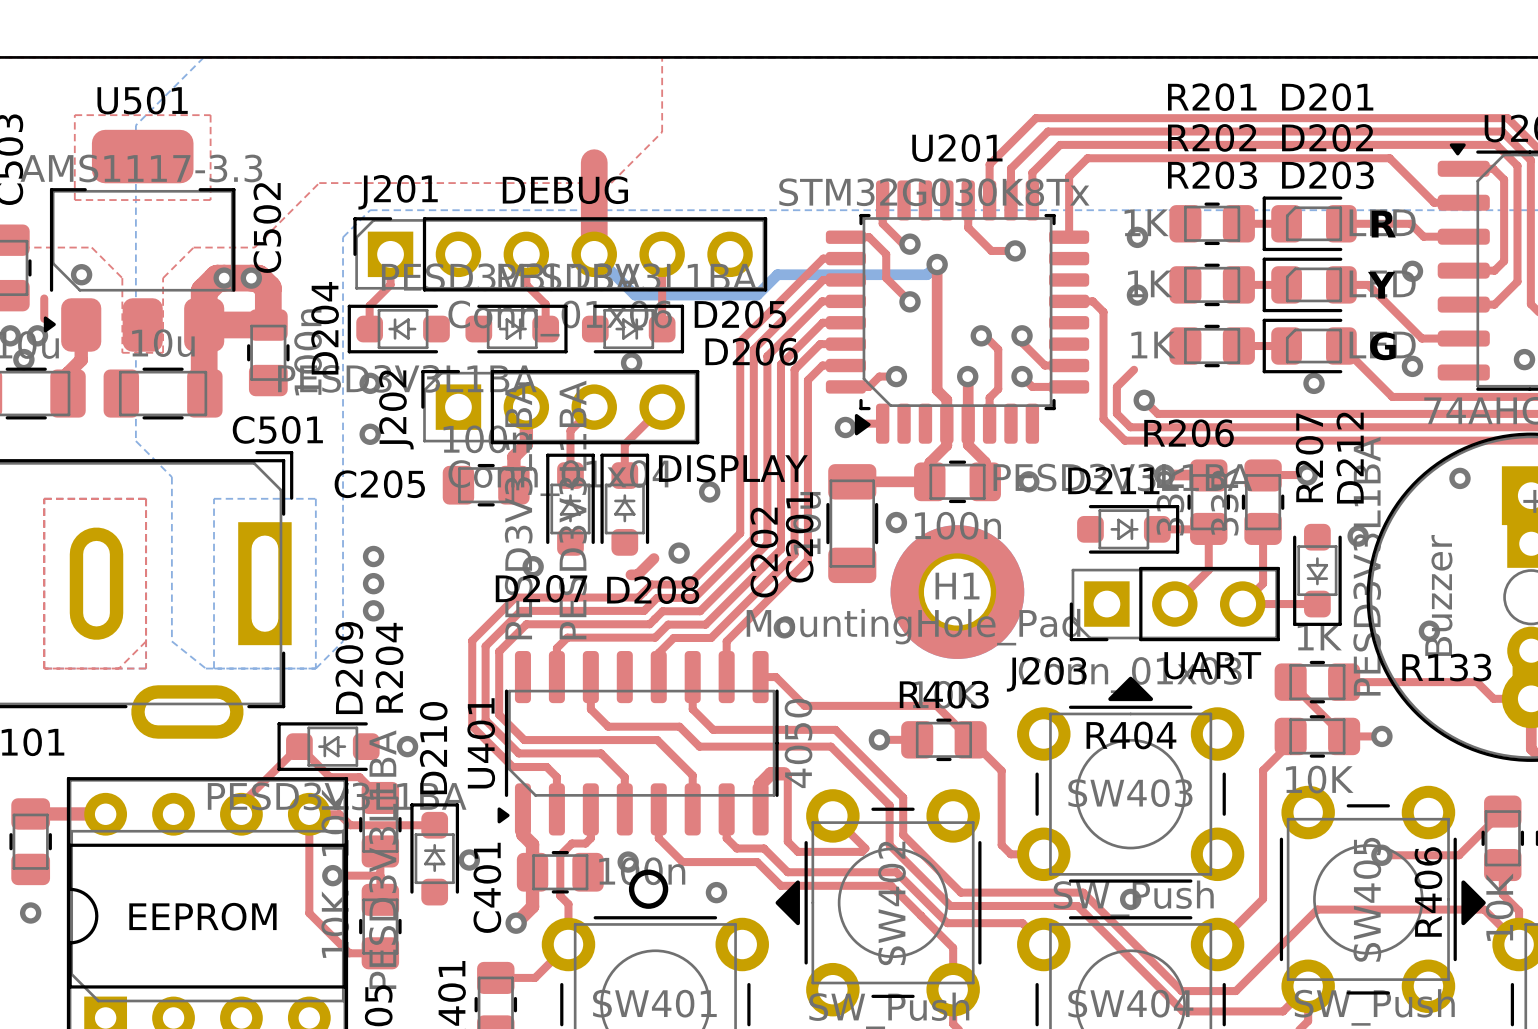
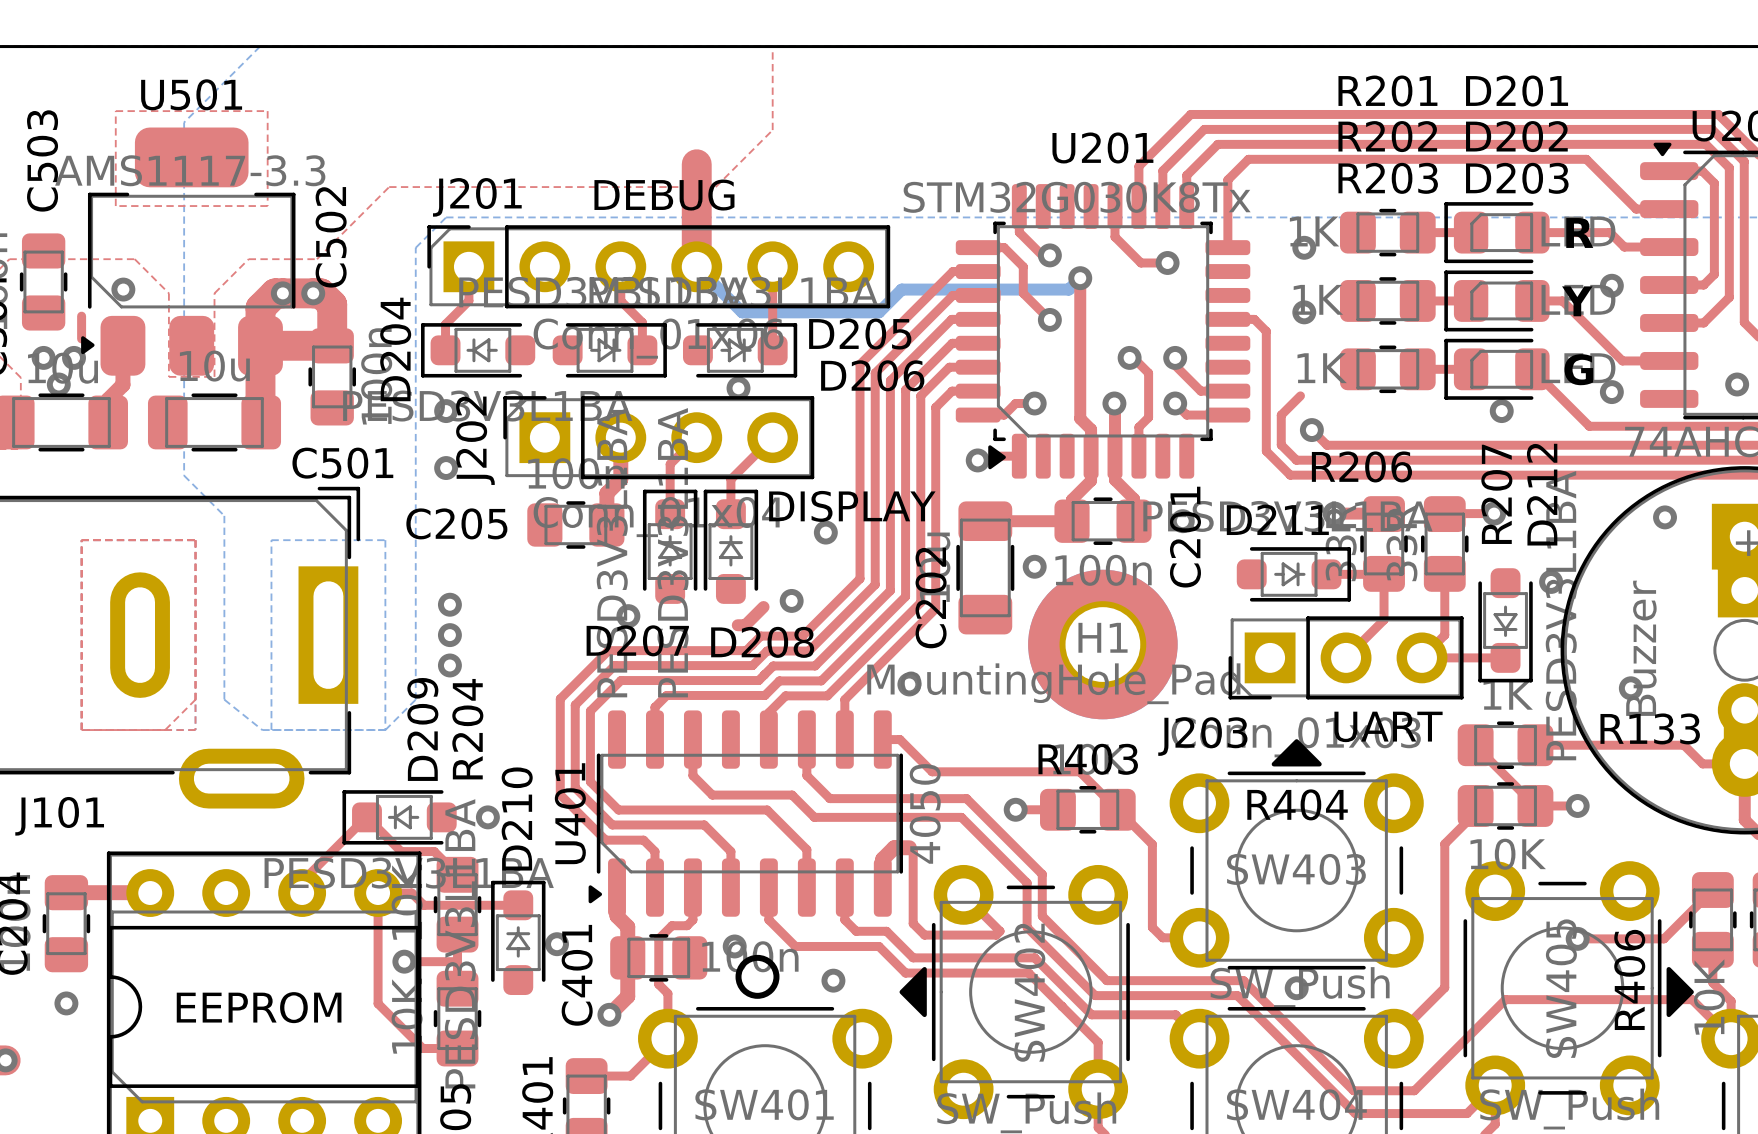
C201 name position: C201 (799, 537) -> C201 (1185, 537)
C202 name position: C202 (764, 552) -> C202 (931, 598)

